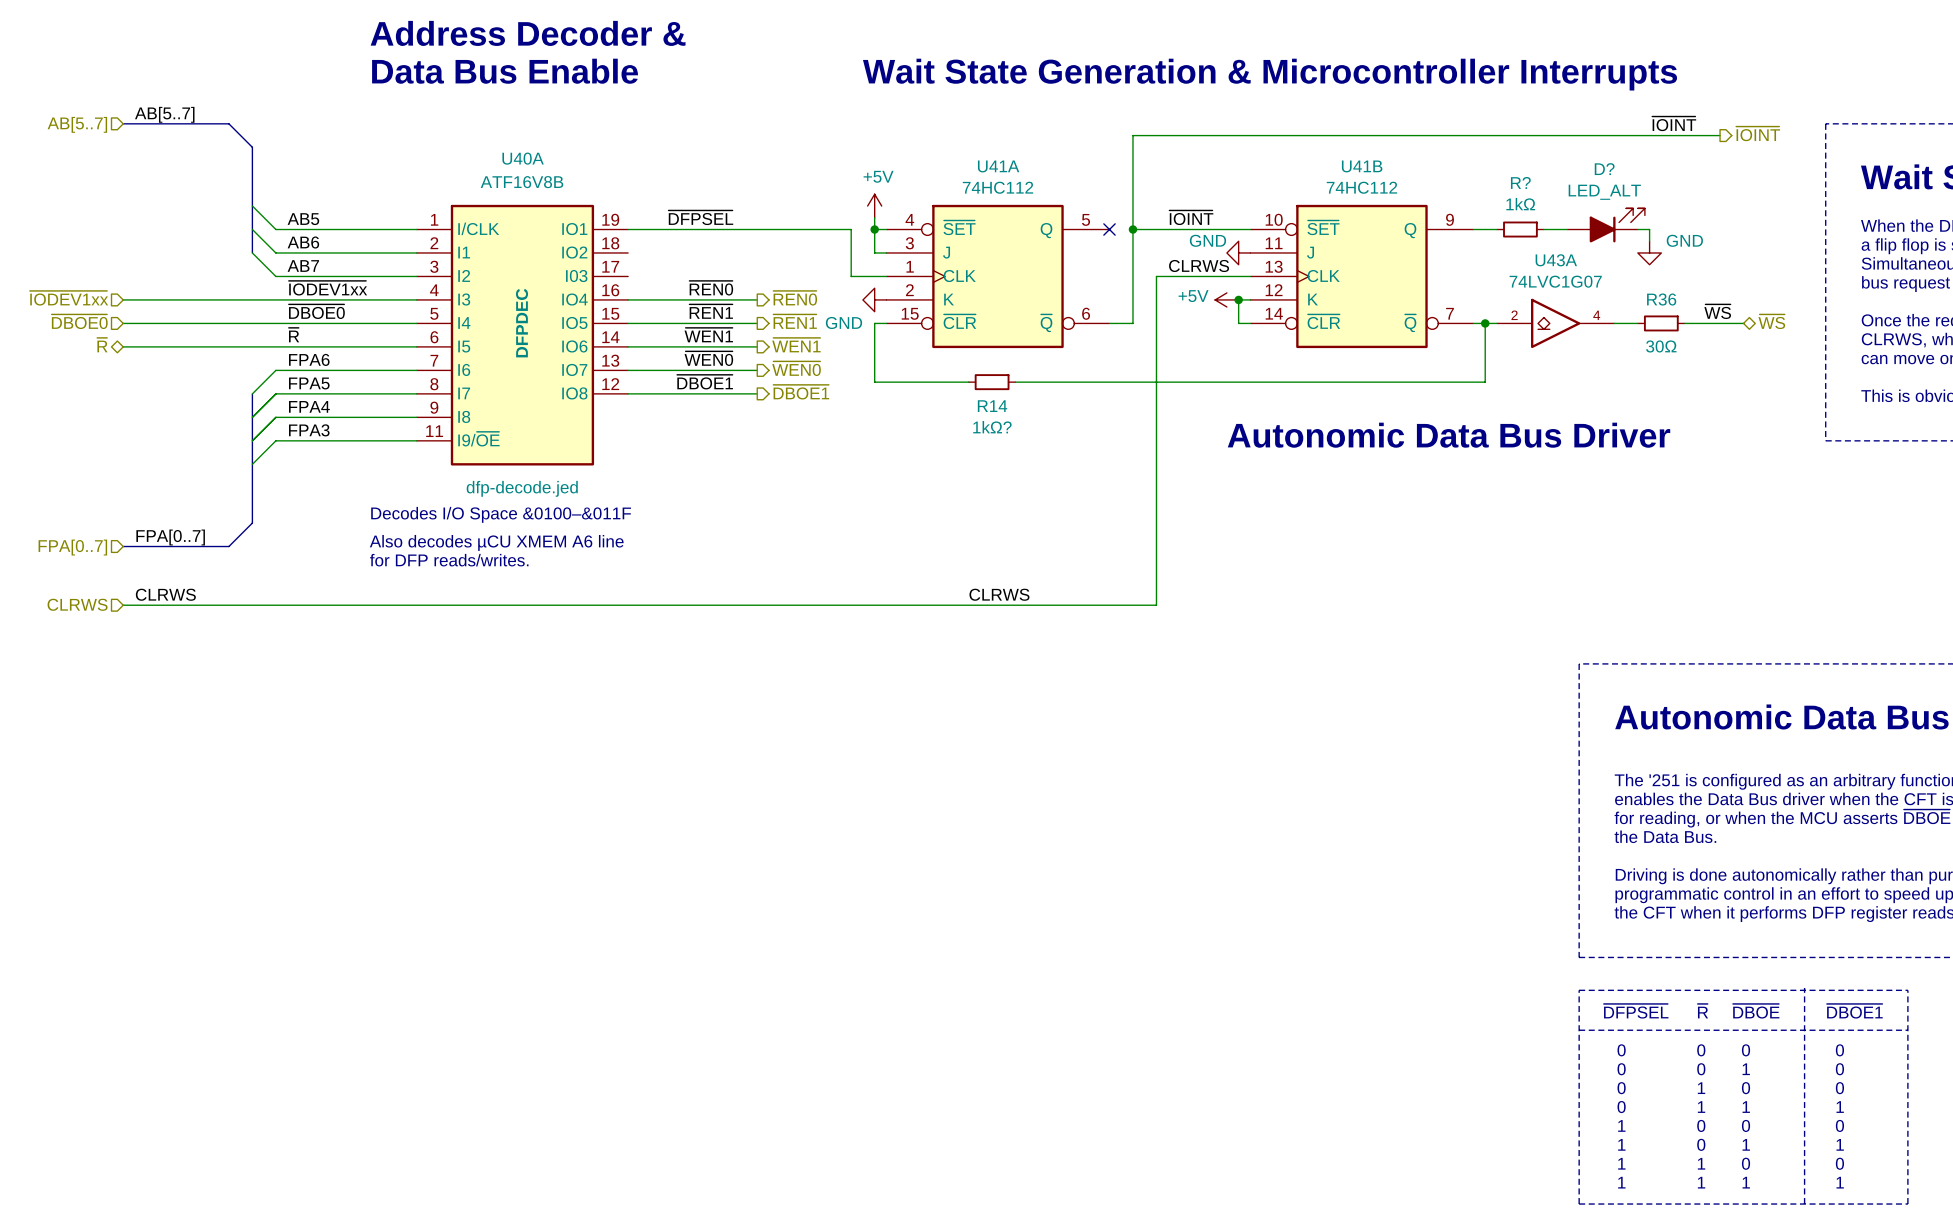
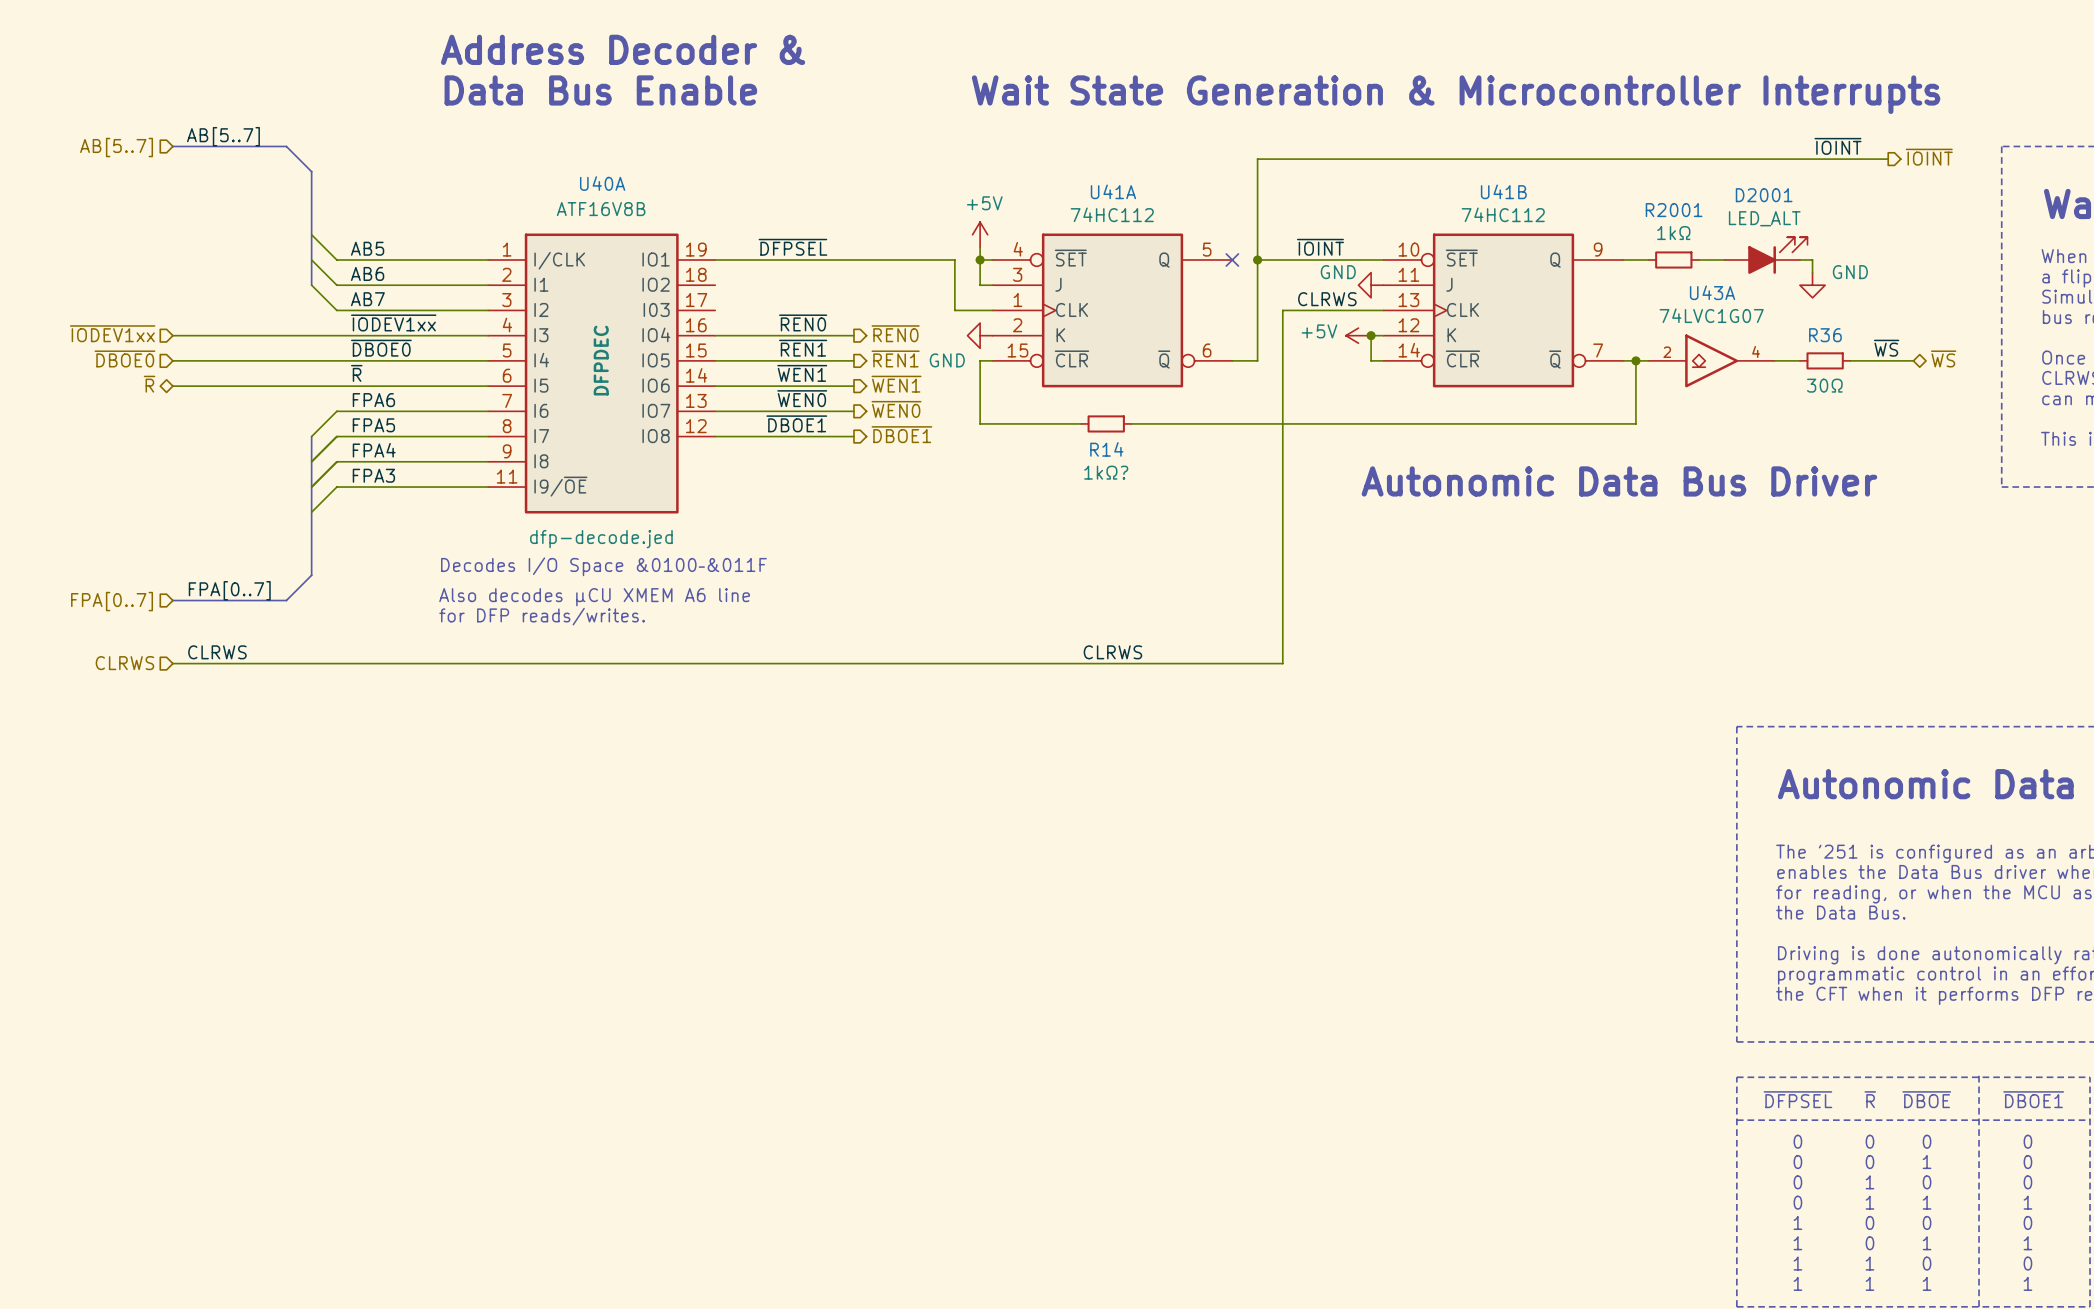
D? name: D? (1604, 169) -> D2001 (1764, 195)
R? name: R? (1520, 182) -> R2001 (1674, 210)

